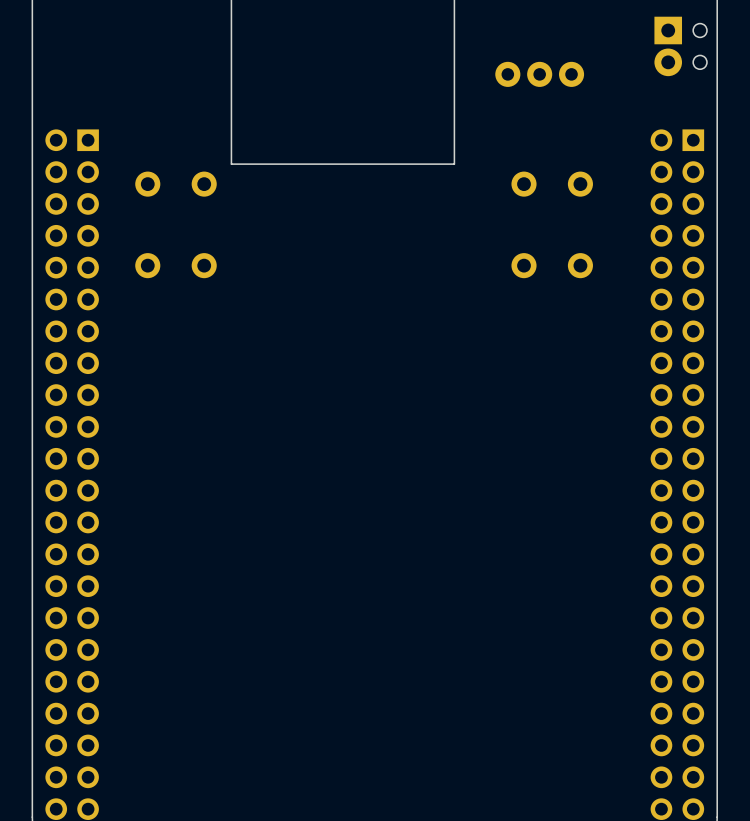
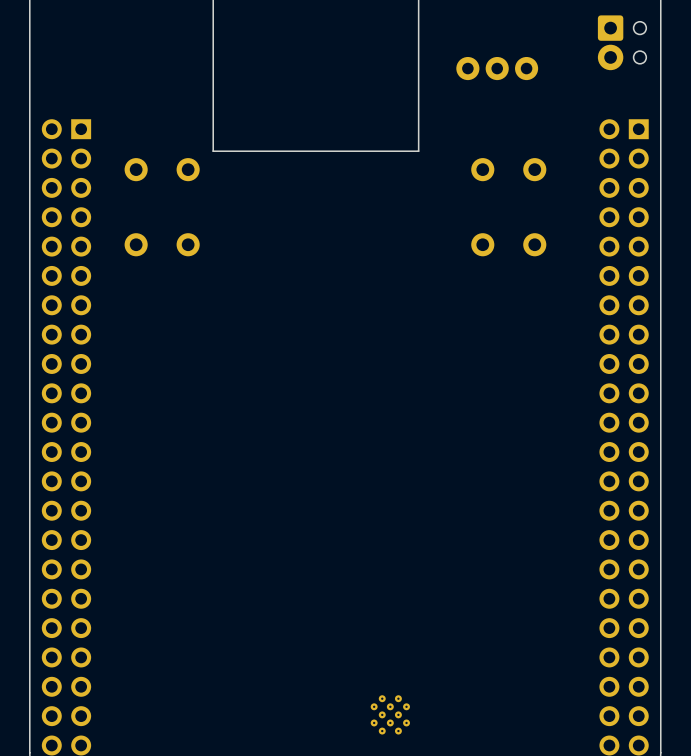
part footprint: [654, 16, 707, 77] -> [597, 15, 647, 71]
part: none -> (390, 714)

